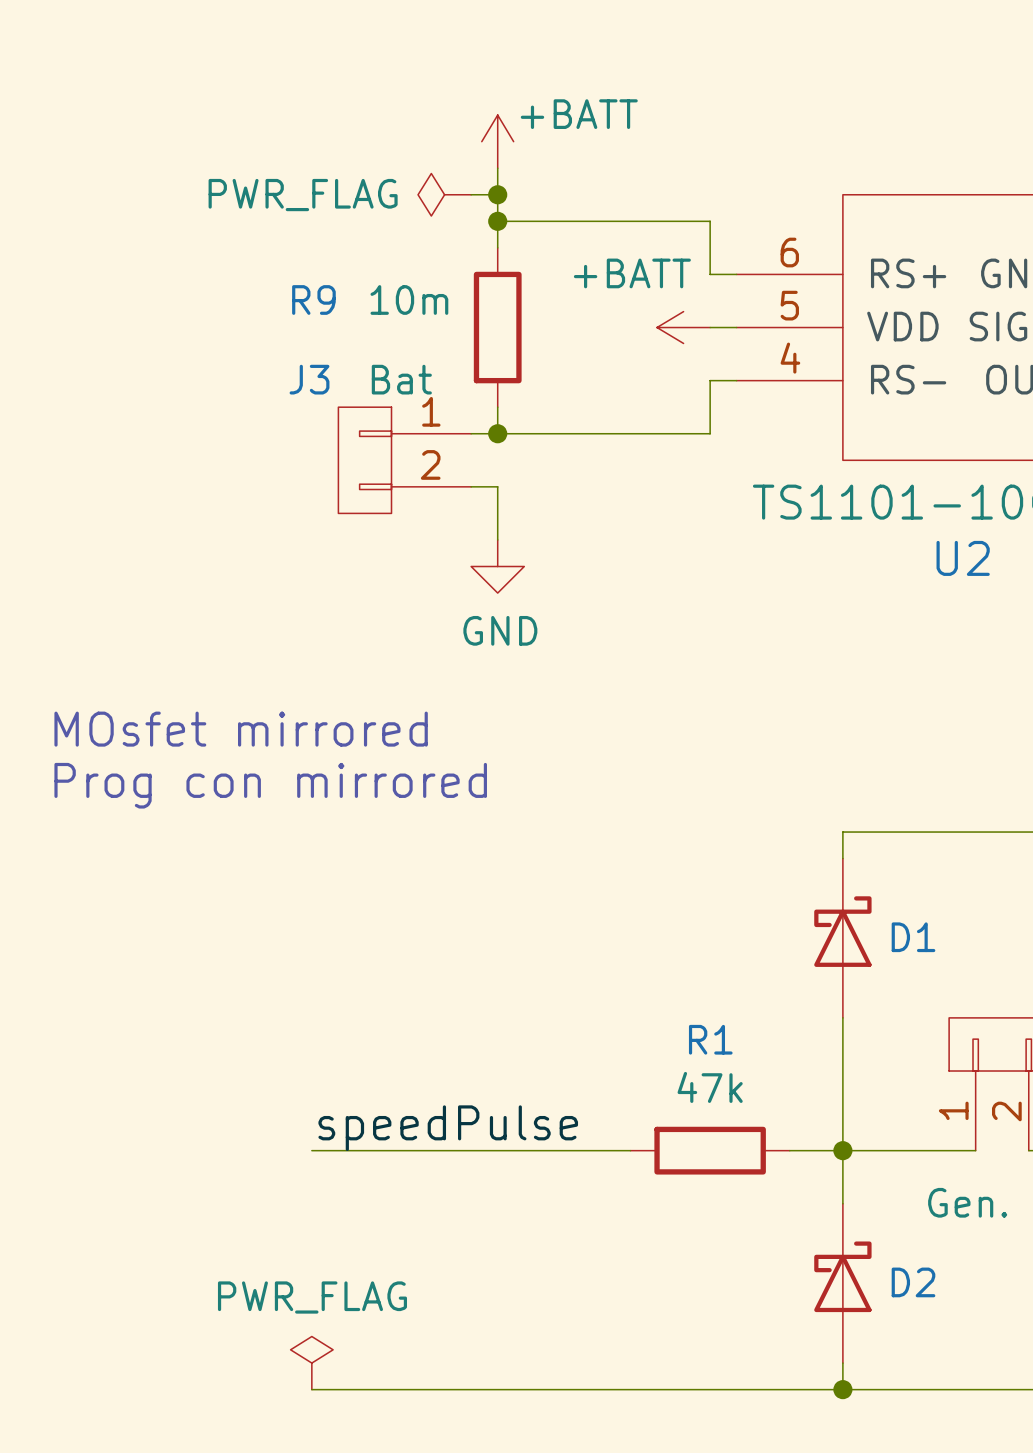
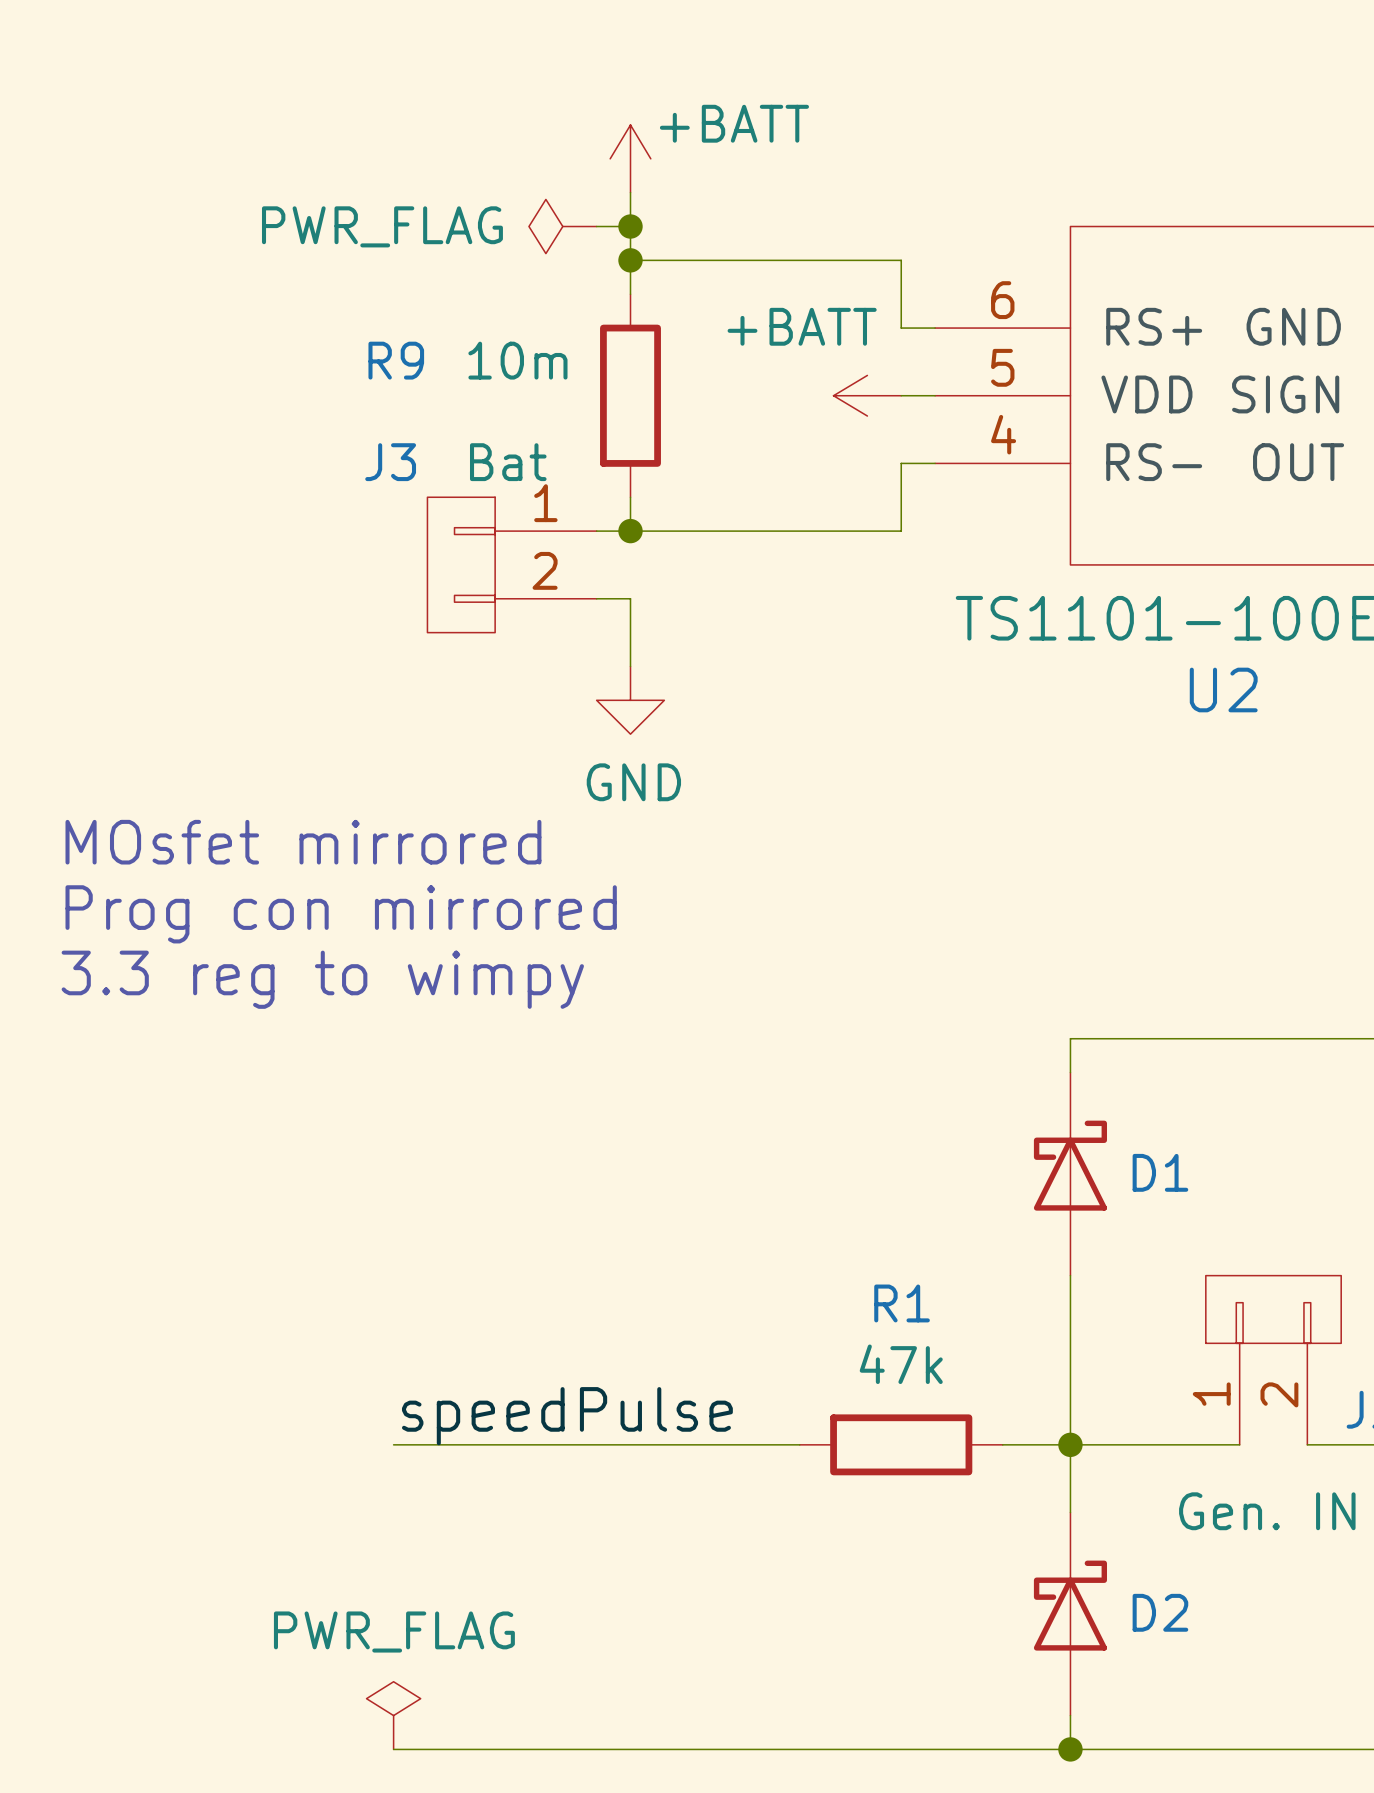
text: none -> MOsfet mirrored (303, 842)
text: MOsfet mirrored (241, 729) -> Prog con mirrored (341, 914)
text: Prog con mirrored (270, 785) -> 3.3 reg to wimpy (322, 979)

